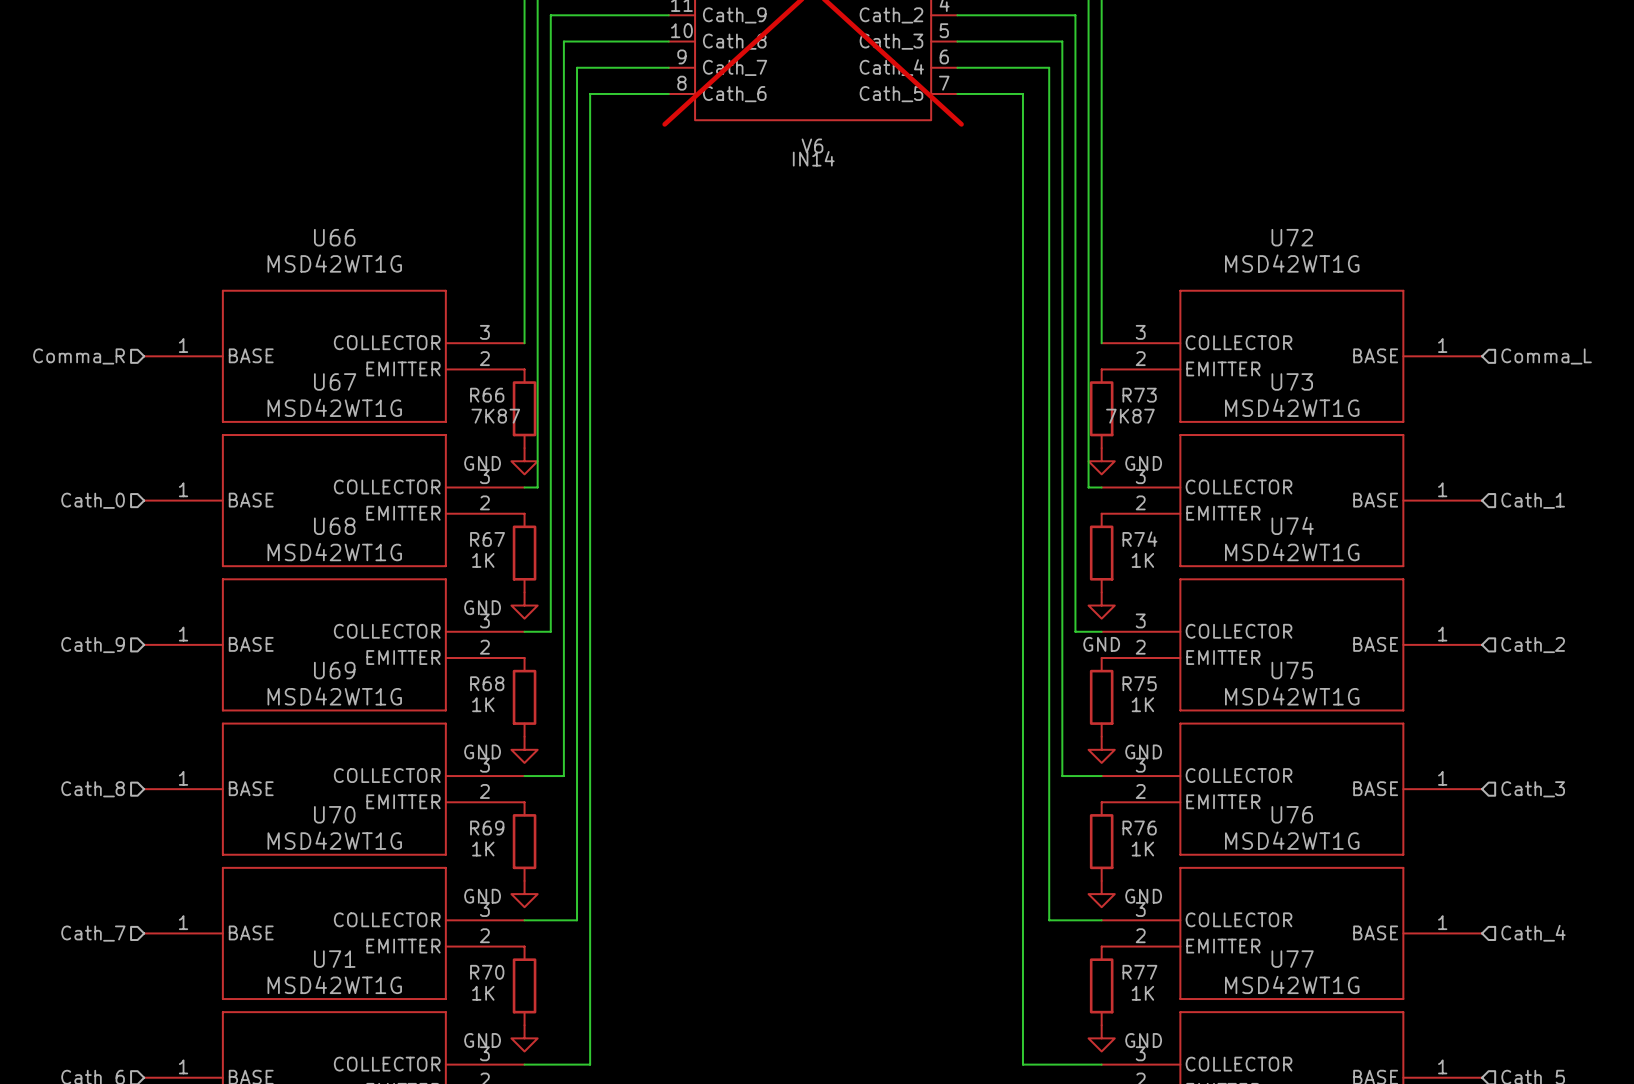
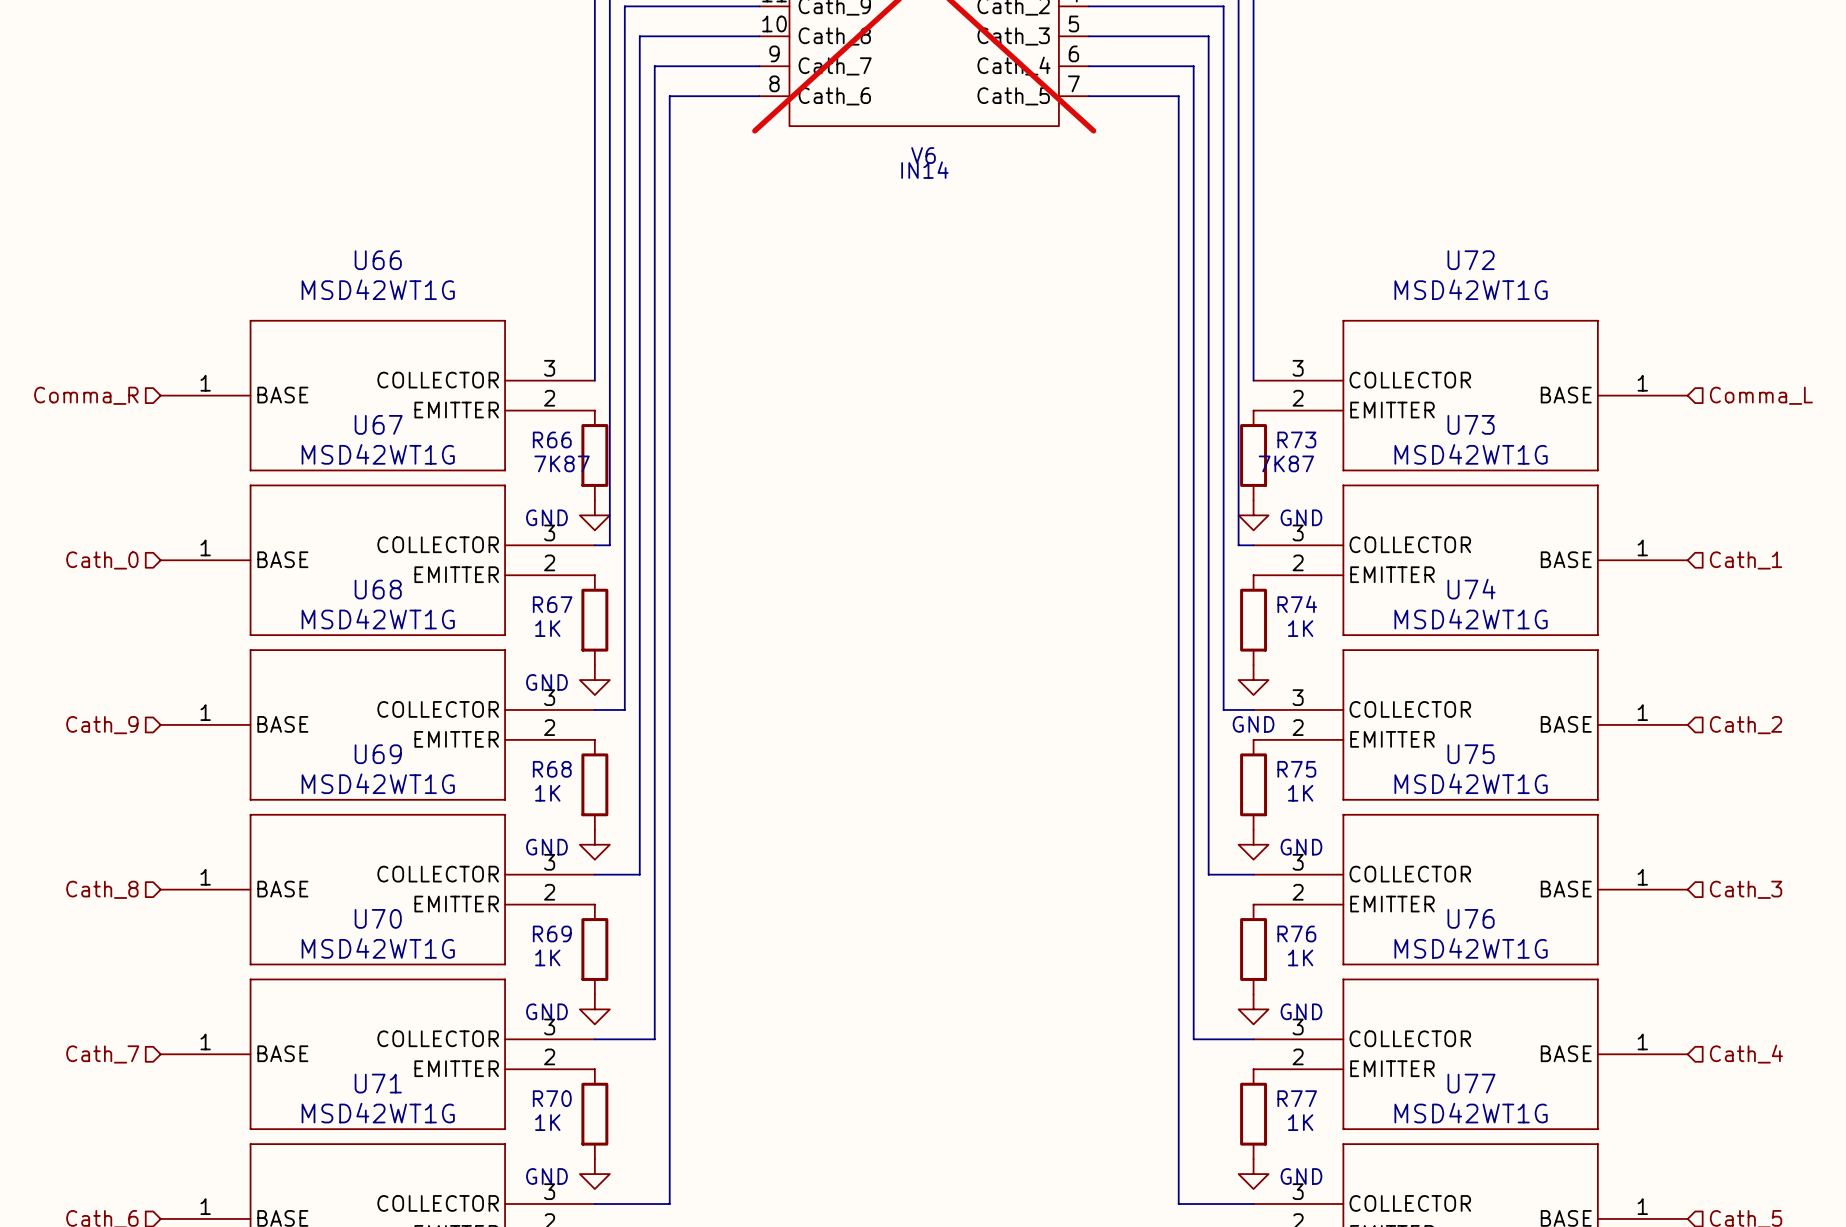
wire: (1022, 93) (1022, 1064) (1036, 1064) -> (1163, 96) (1178, 96) (1178, 1204)

